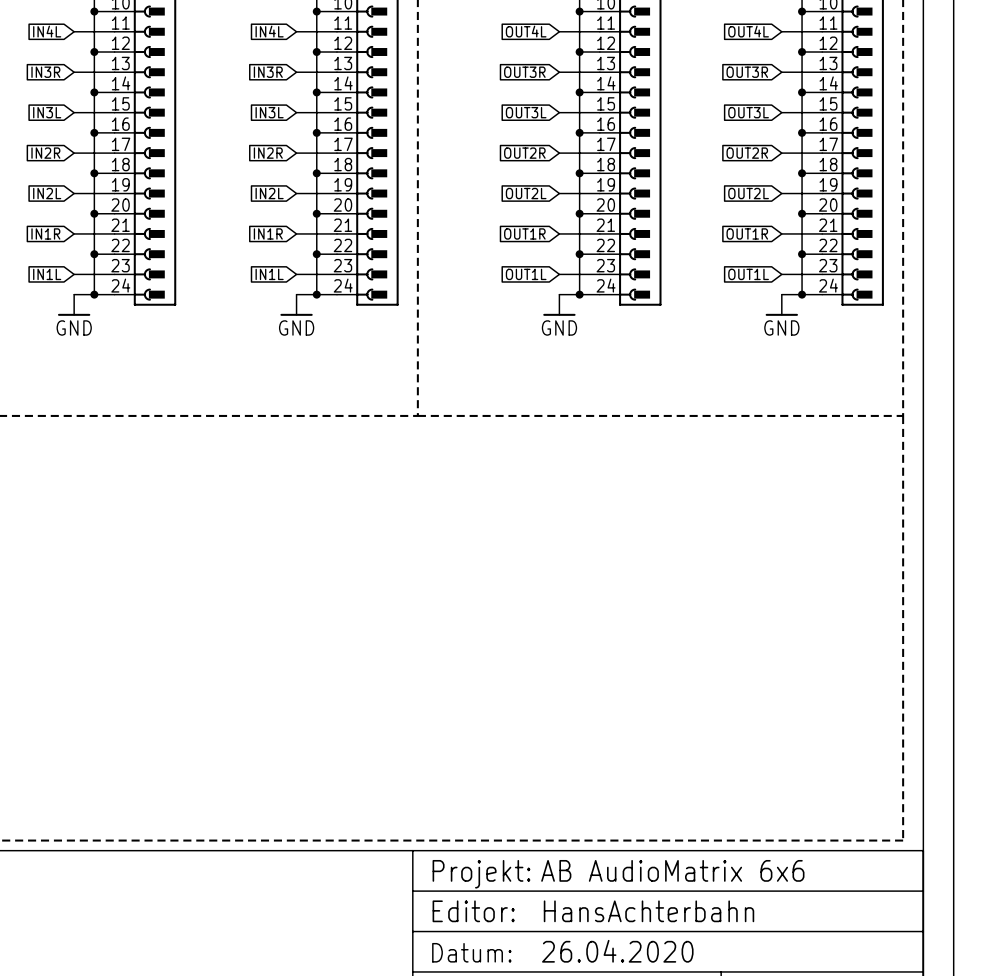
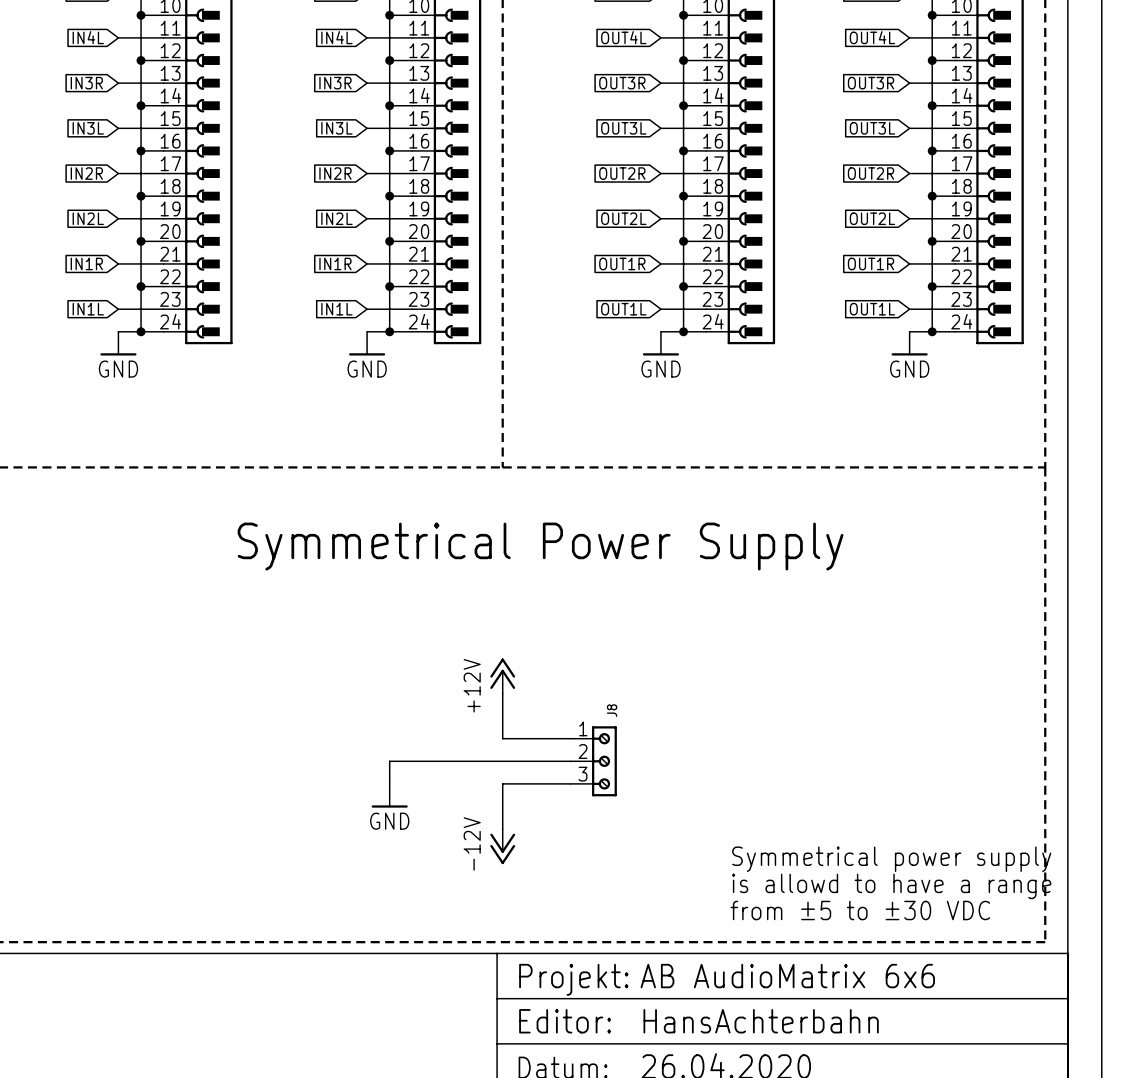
text: none -> Symmetrical Power Supply (540, 546)
power symbol: none -> +12V (502, 675)
wire: none -> (502, 693) (502, 738) (570, 738)
wire: none -> (570, 761) (389, 761) (389, 783)
J8: none -> (593, 761)
wire: none -> (570, 783) (502, 783) (502, 829)
power symbol: none -> GND (389, 795)
power symbol: none -> -12V (502, 846)
text: none -> Symmetrical power supply (891, 859)
text: none -> is allowd to have a range (891, 886)
text: none -> from ±5 to ±30 VDC (860, 910)

